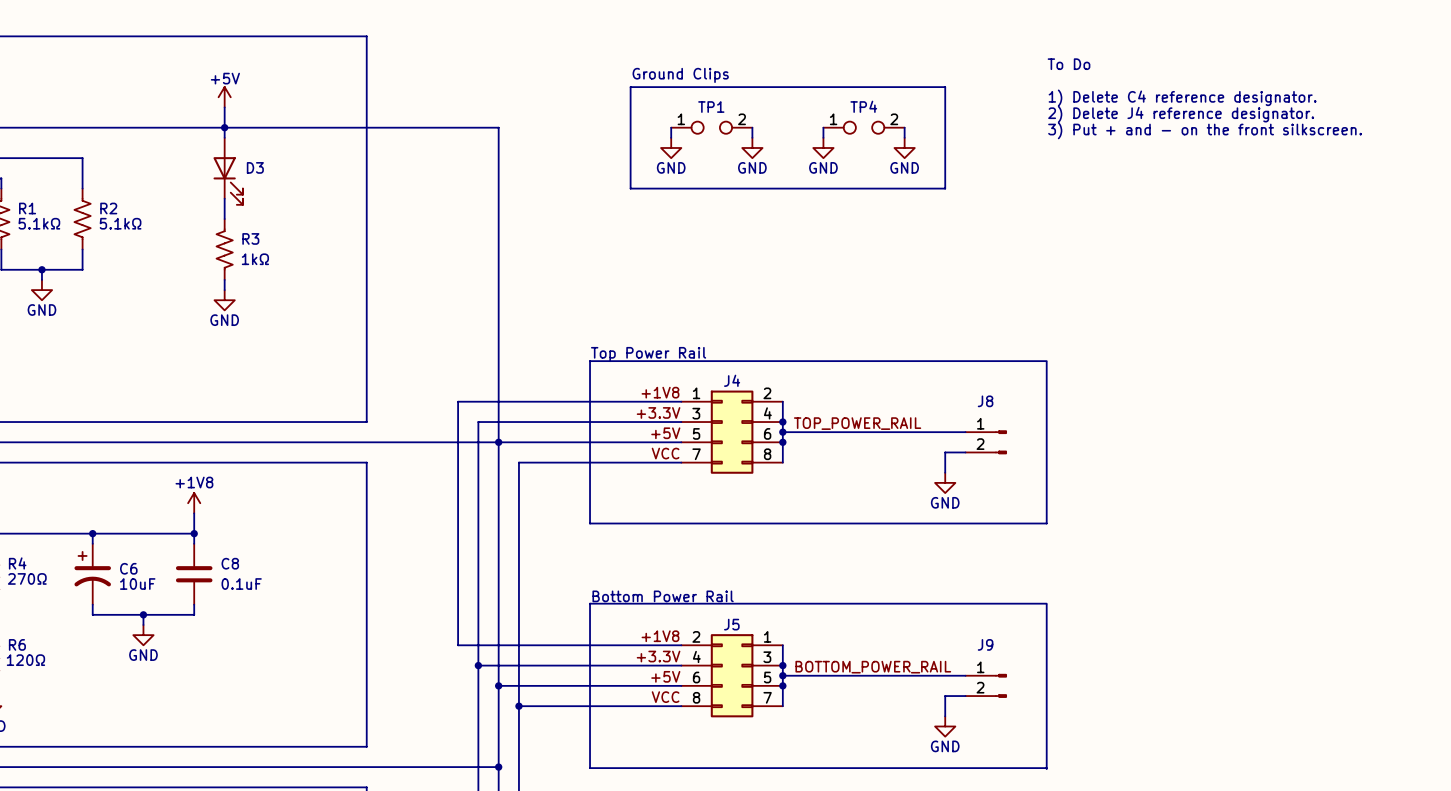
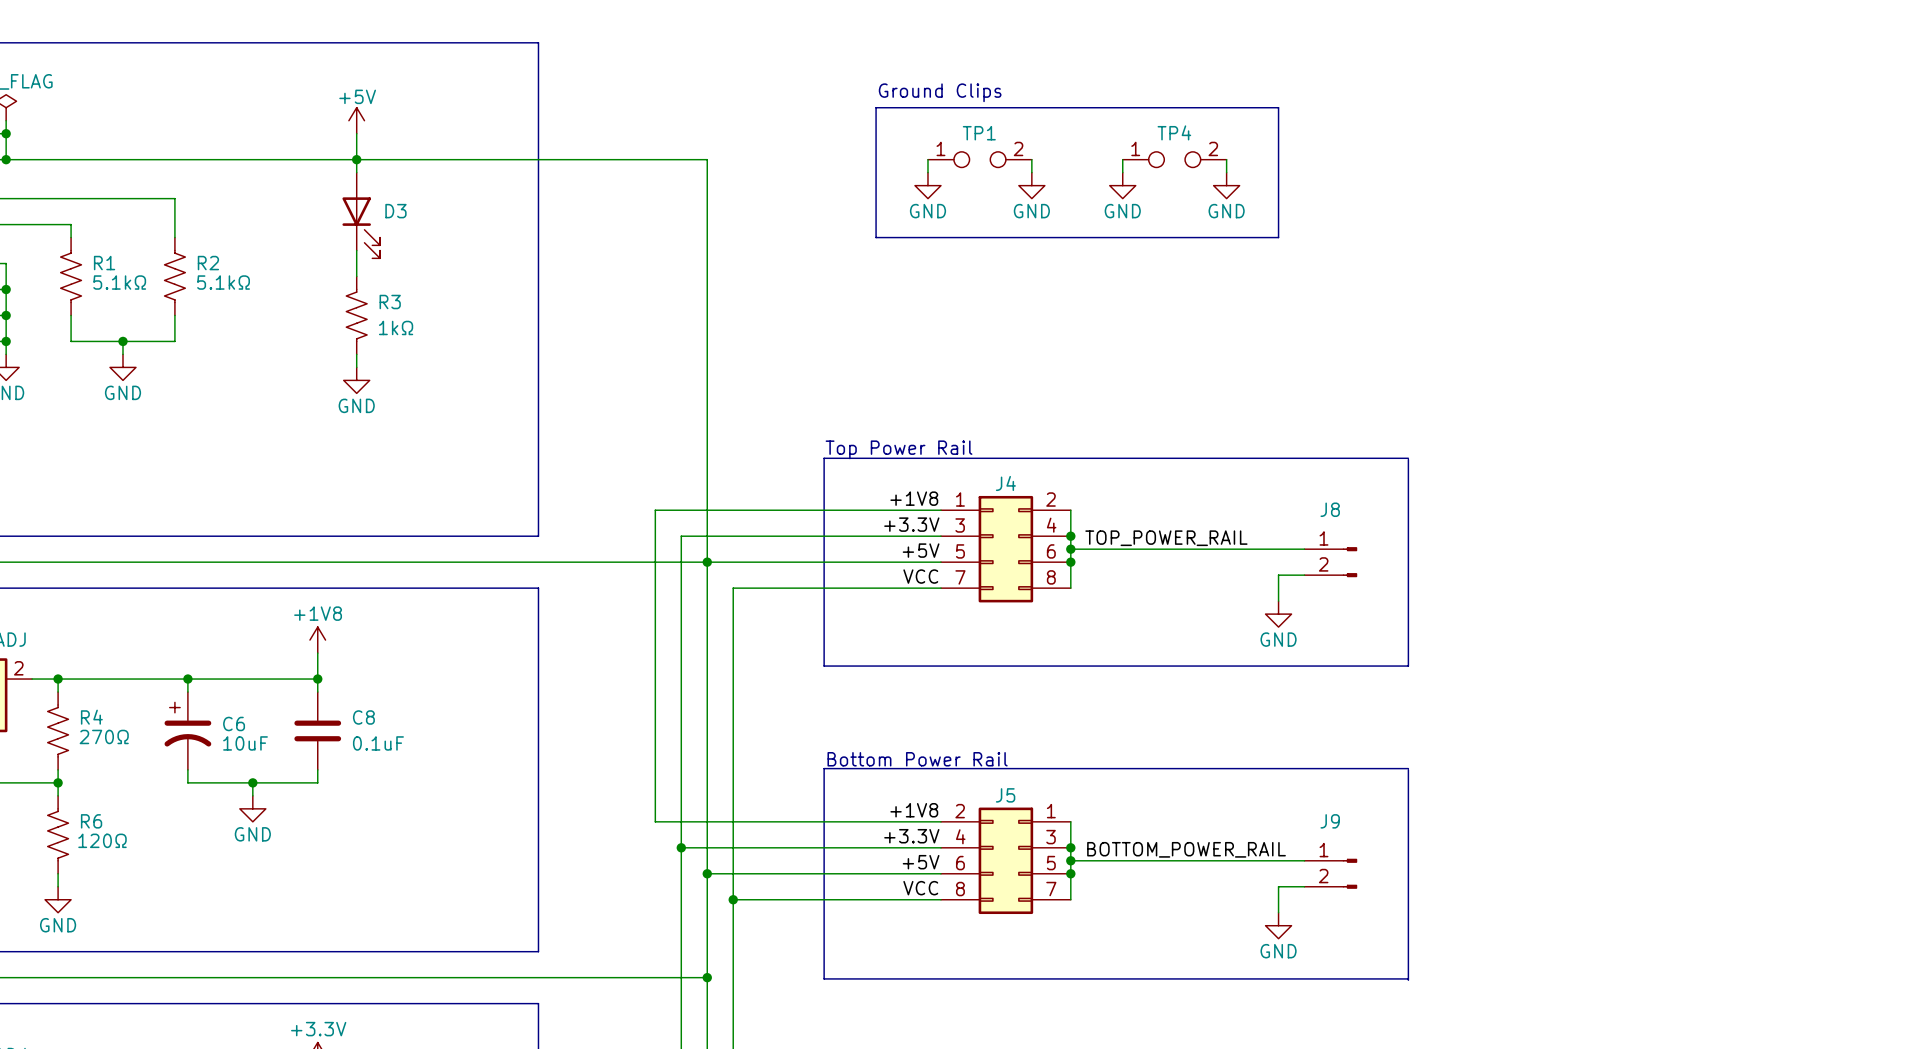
text: To Do (1069, 64) -> none
text: 1) Delete C4 reference designator. (1182, 98) -> none
text: 2) Delete J4 reference designator. (1181, 114) -> none
text: 3) Put + and - on the front silkscreen. (1205, 130) -> none

